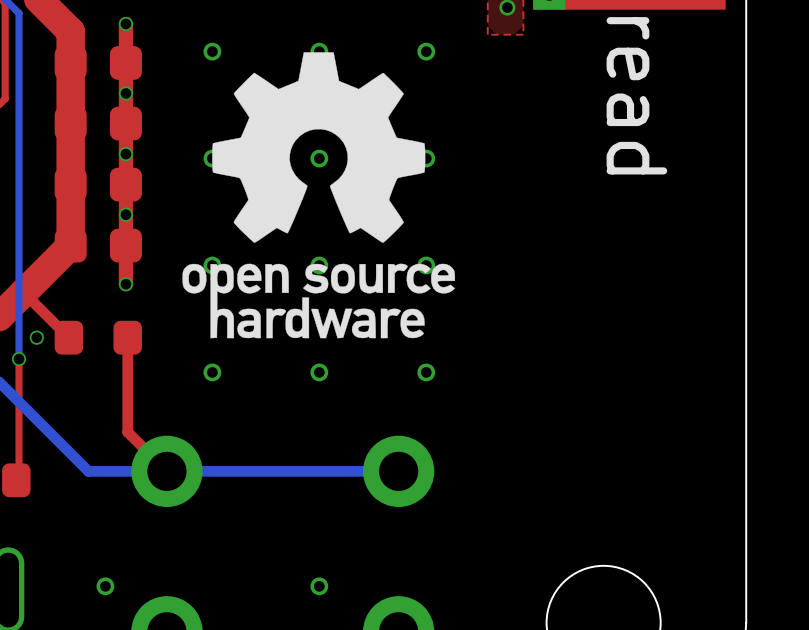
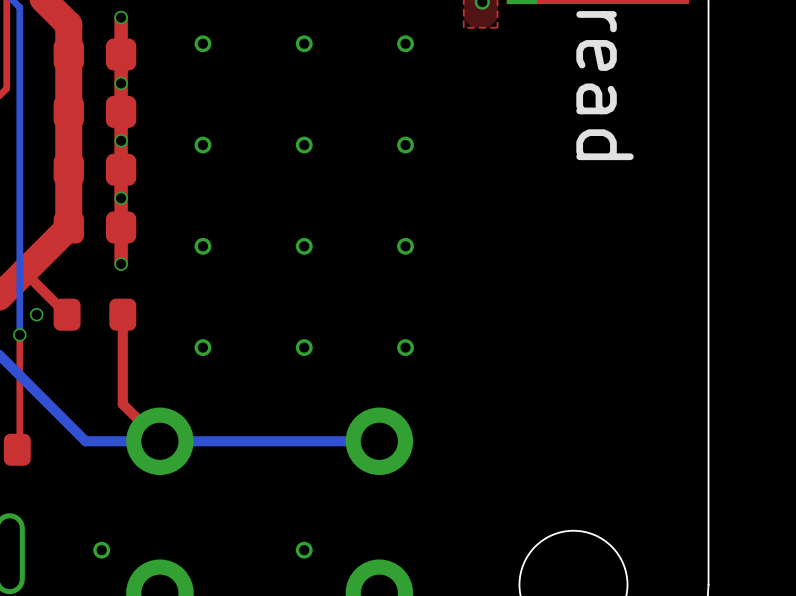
drawing: [182, 52, 456, 339] -> none

